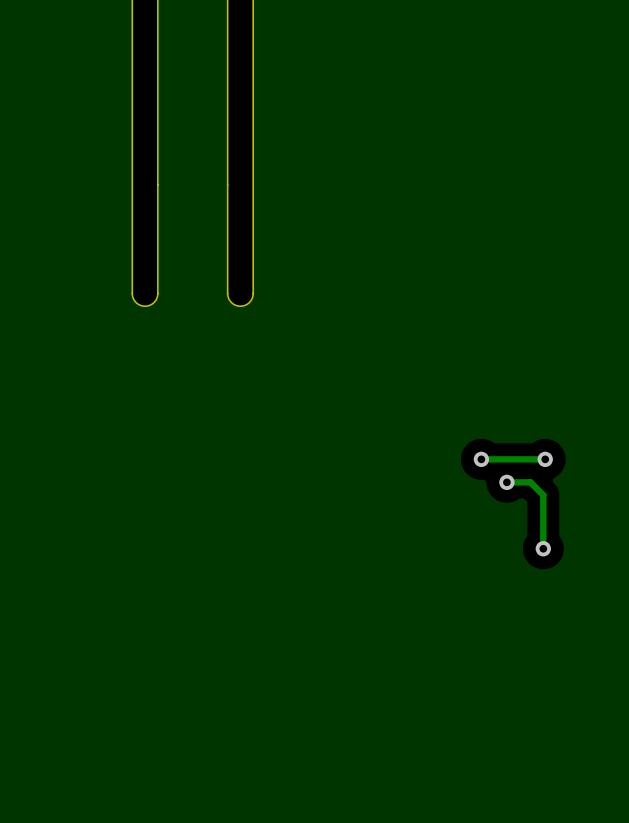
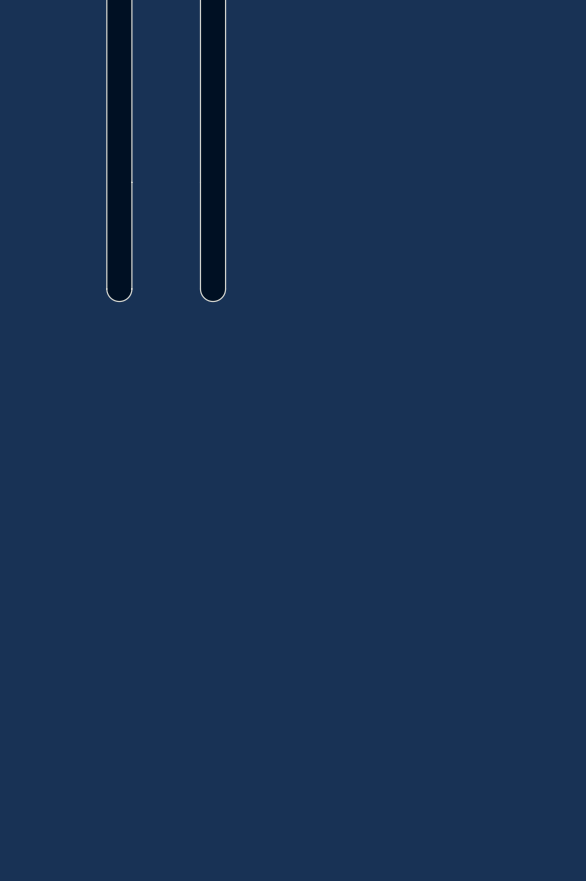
via: (481, 459) -> none
track: (545, 459) (481, 459) -> none
via: (545, 459) -> none
track: (506, 482) (530, 482) (543, 495) (543, 548) -> none
via: (506, 482) -> none
via: (543, 548) -> none

